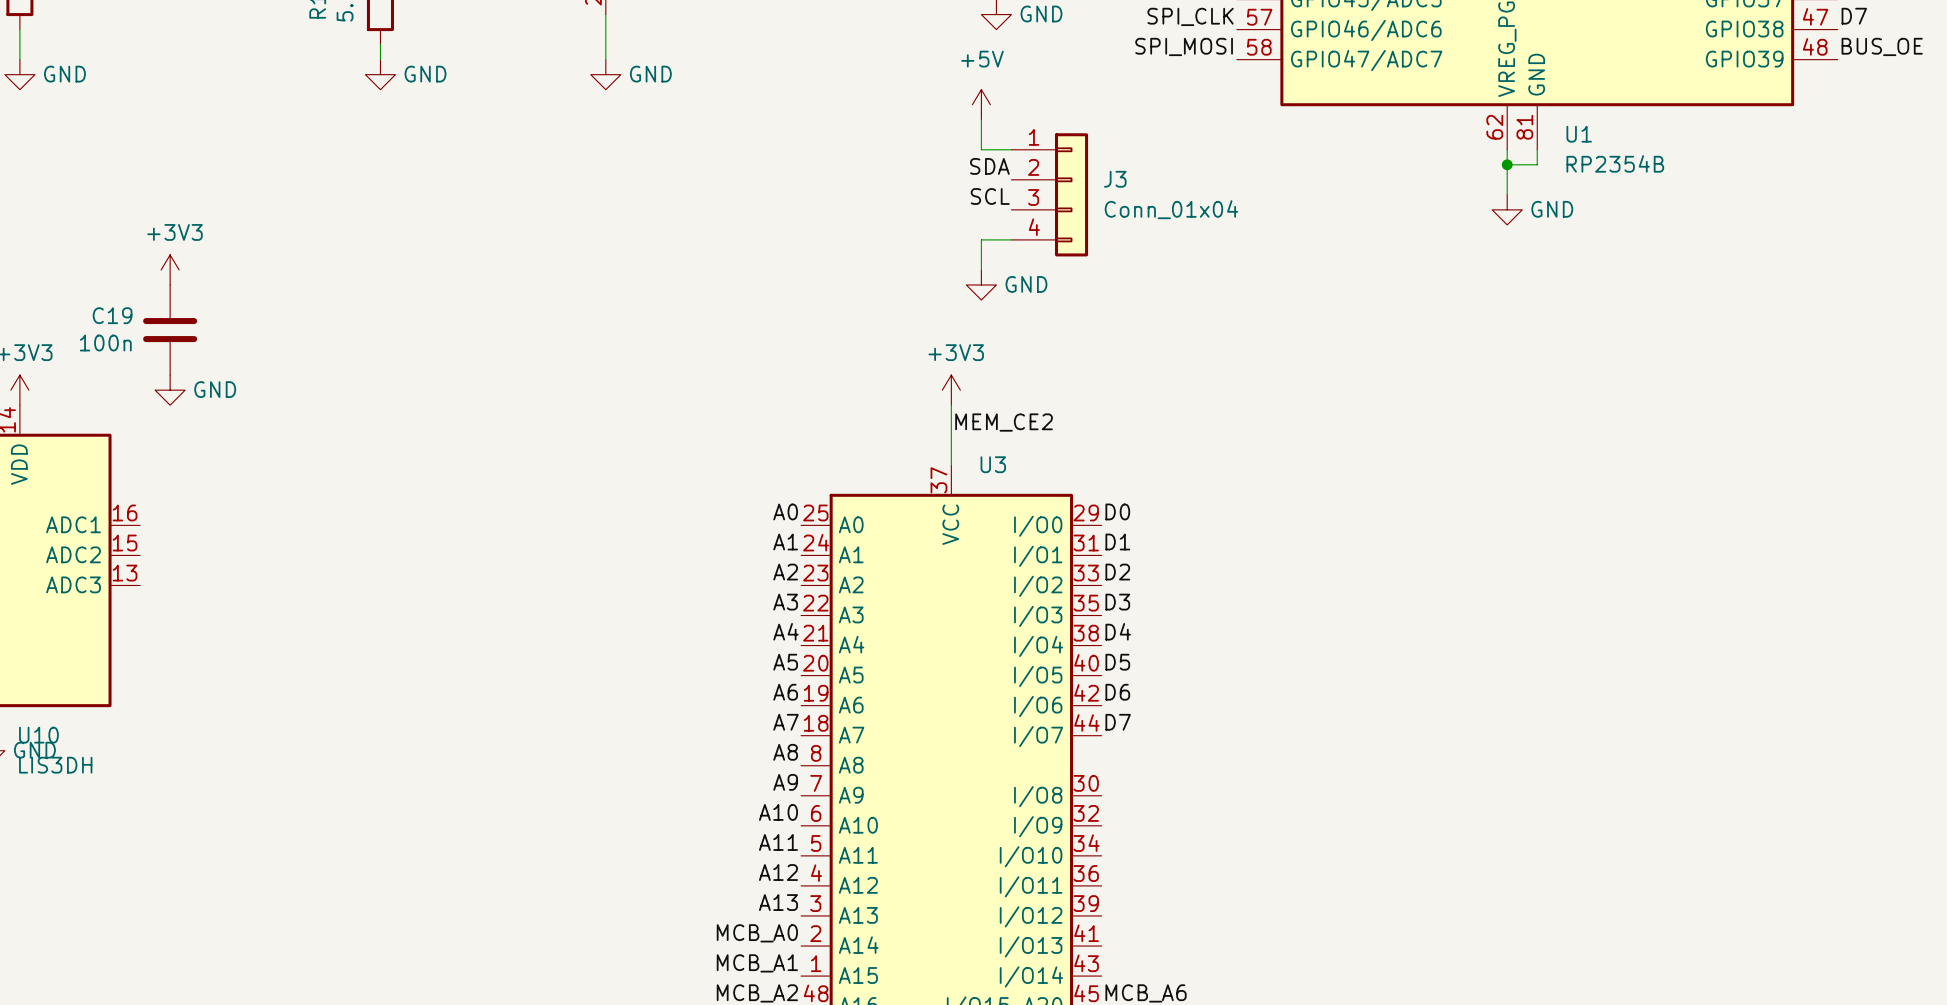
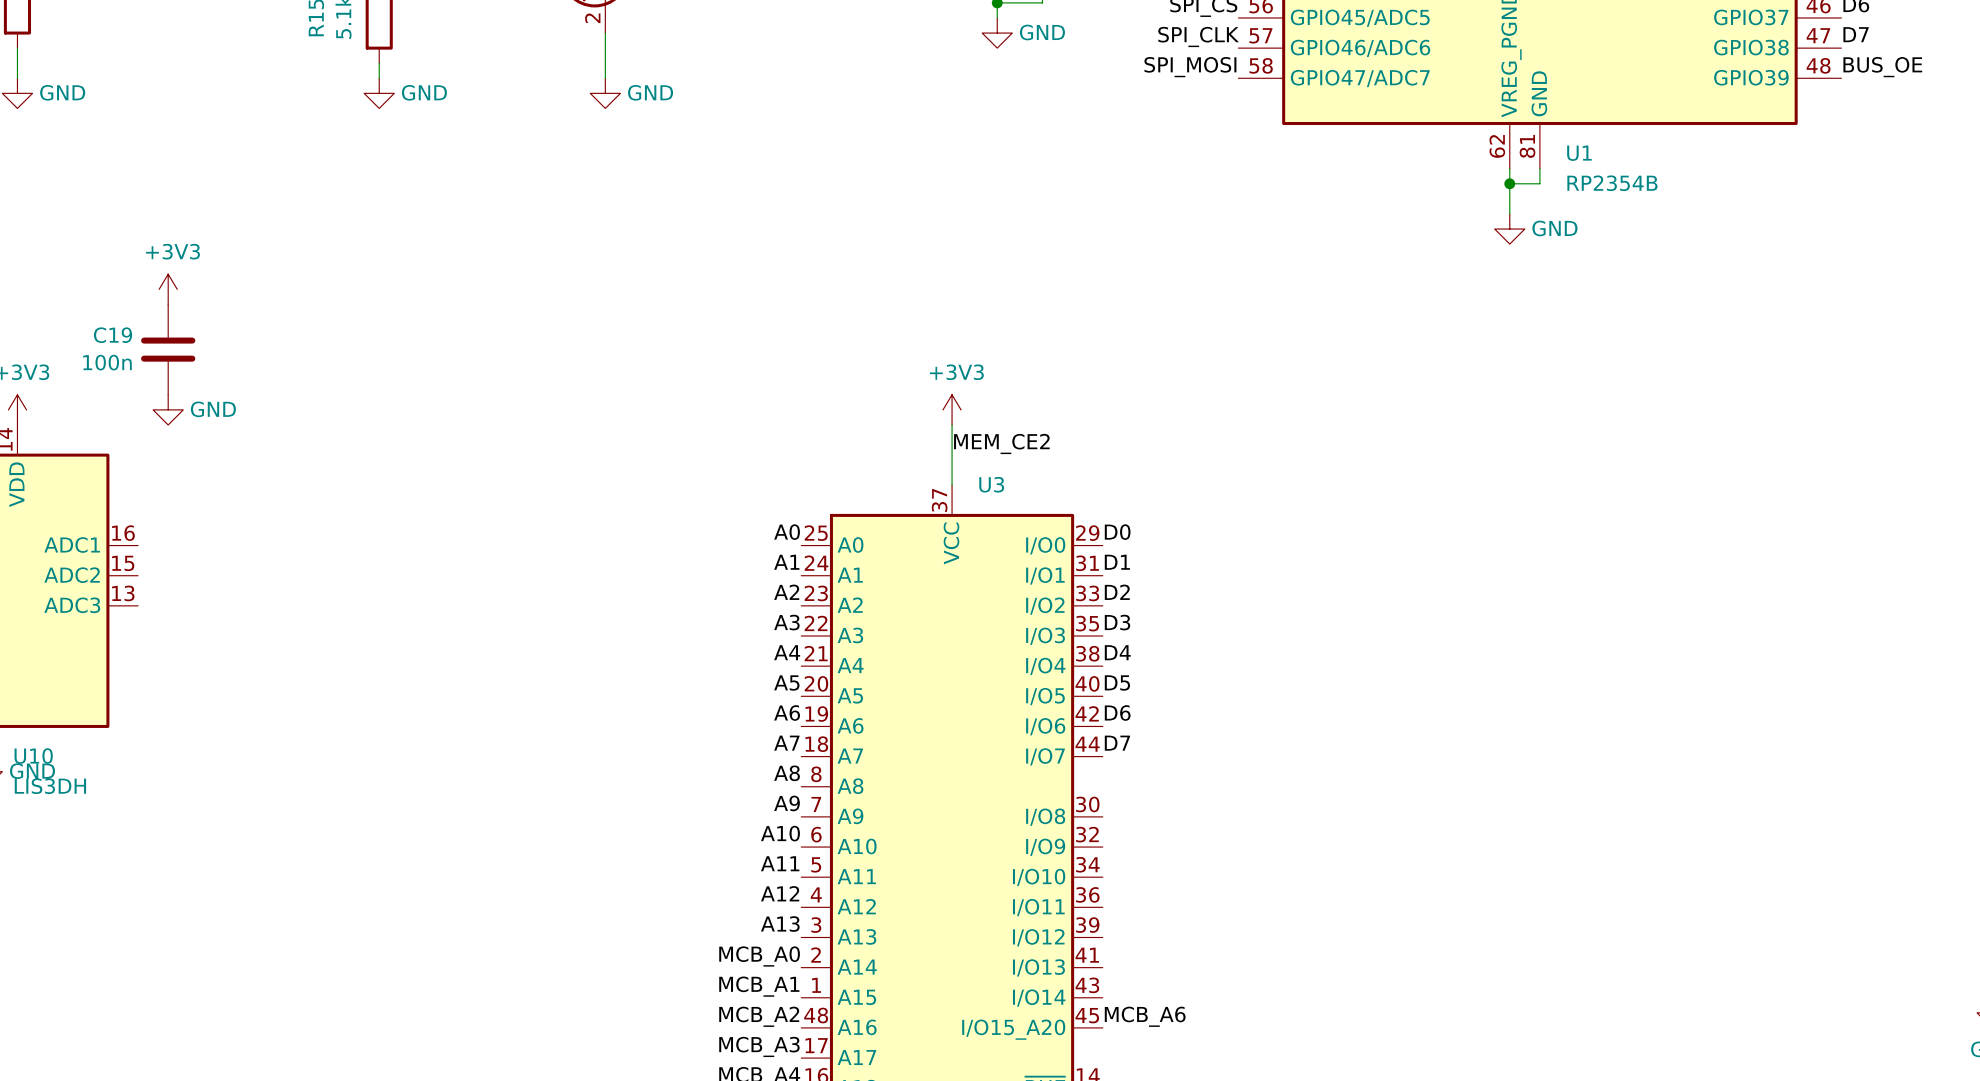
power symbol: +5V (981, 104) -> none
wire: (981, 119) (981, 149) (1011, 149) -> none
label: SDA (989, 166) -> none
J3: Conn_01x04 (1049, 194) -> none
label: SCL (990, 196) -> none
wire: (1011, 239) (981, 239) (981, 269) -> none
power symbol: GND (981, 284) -> none

